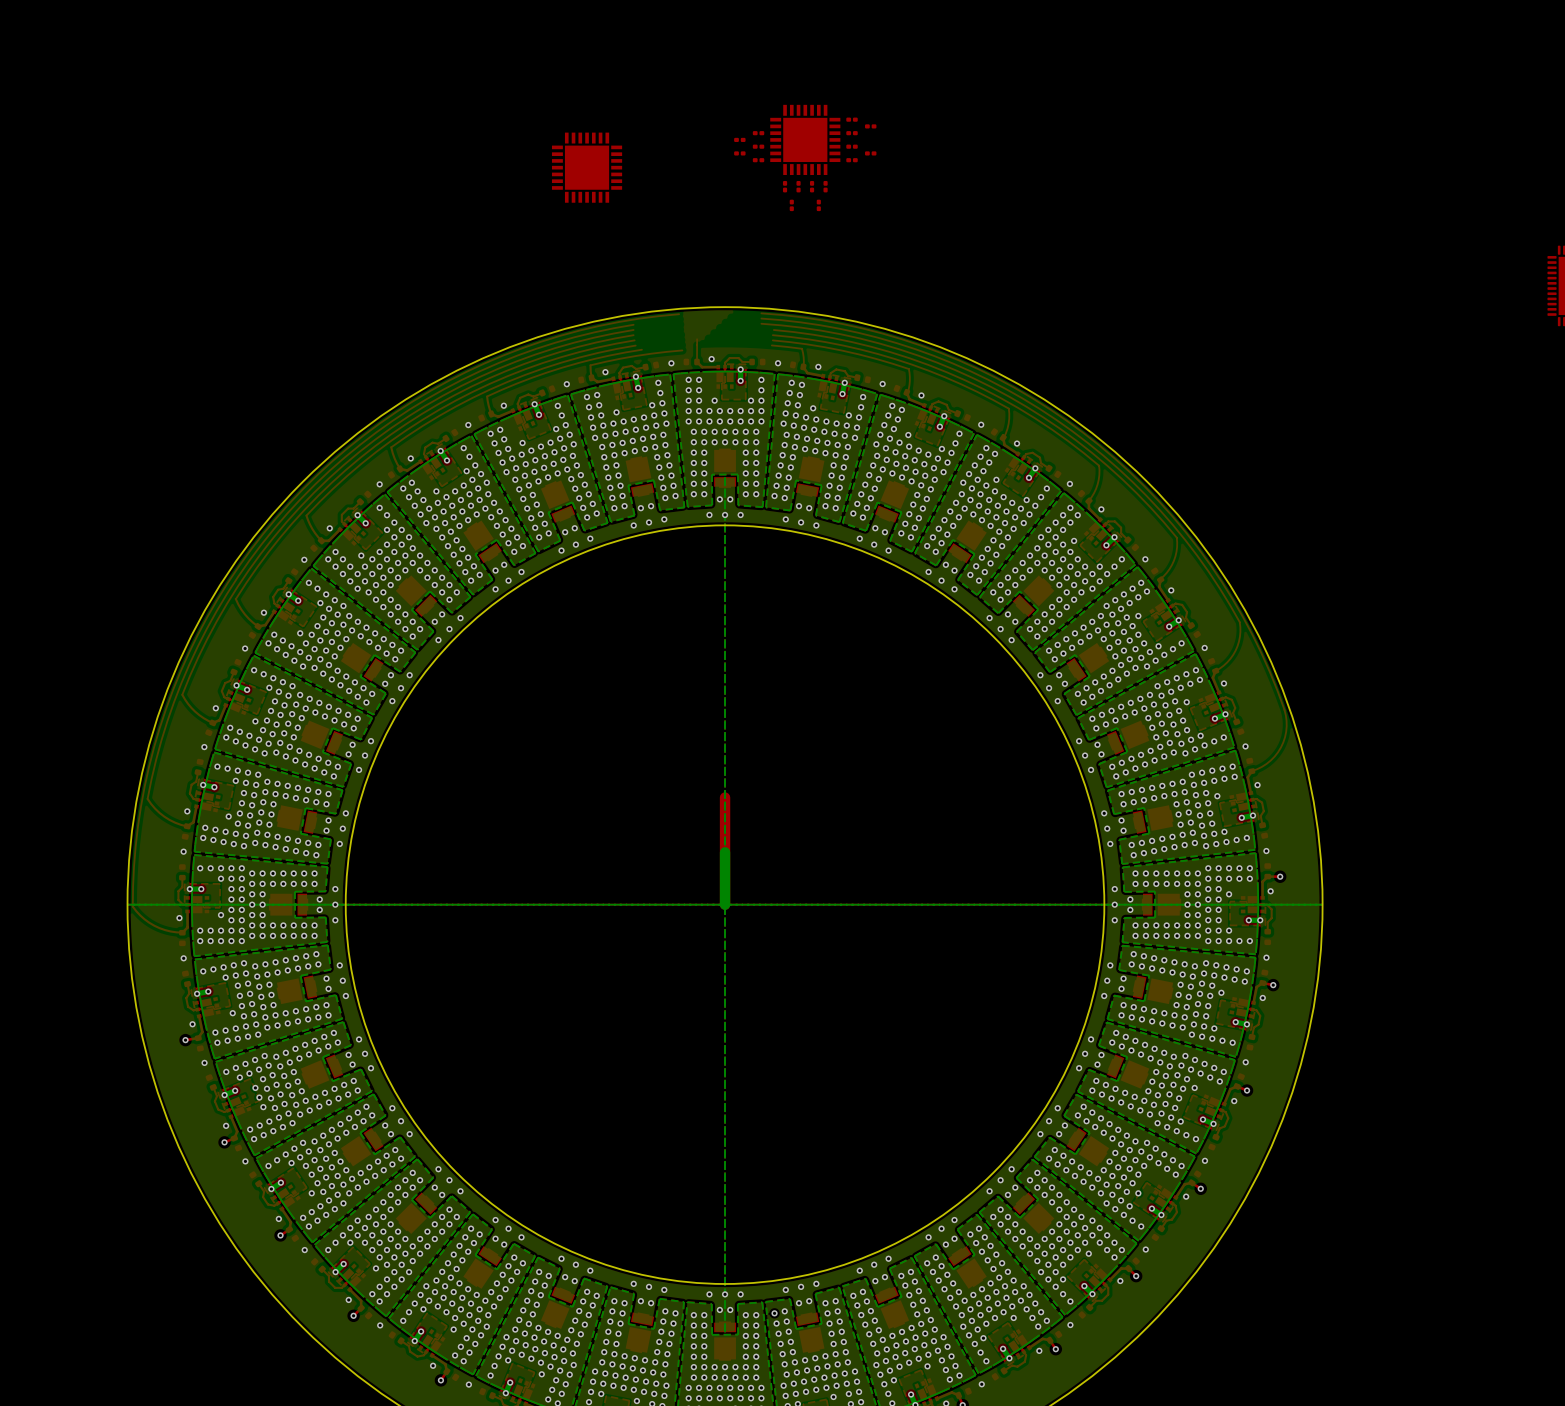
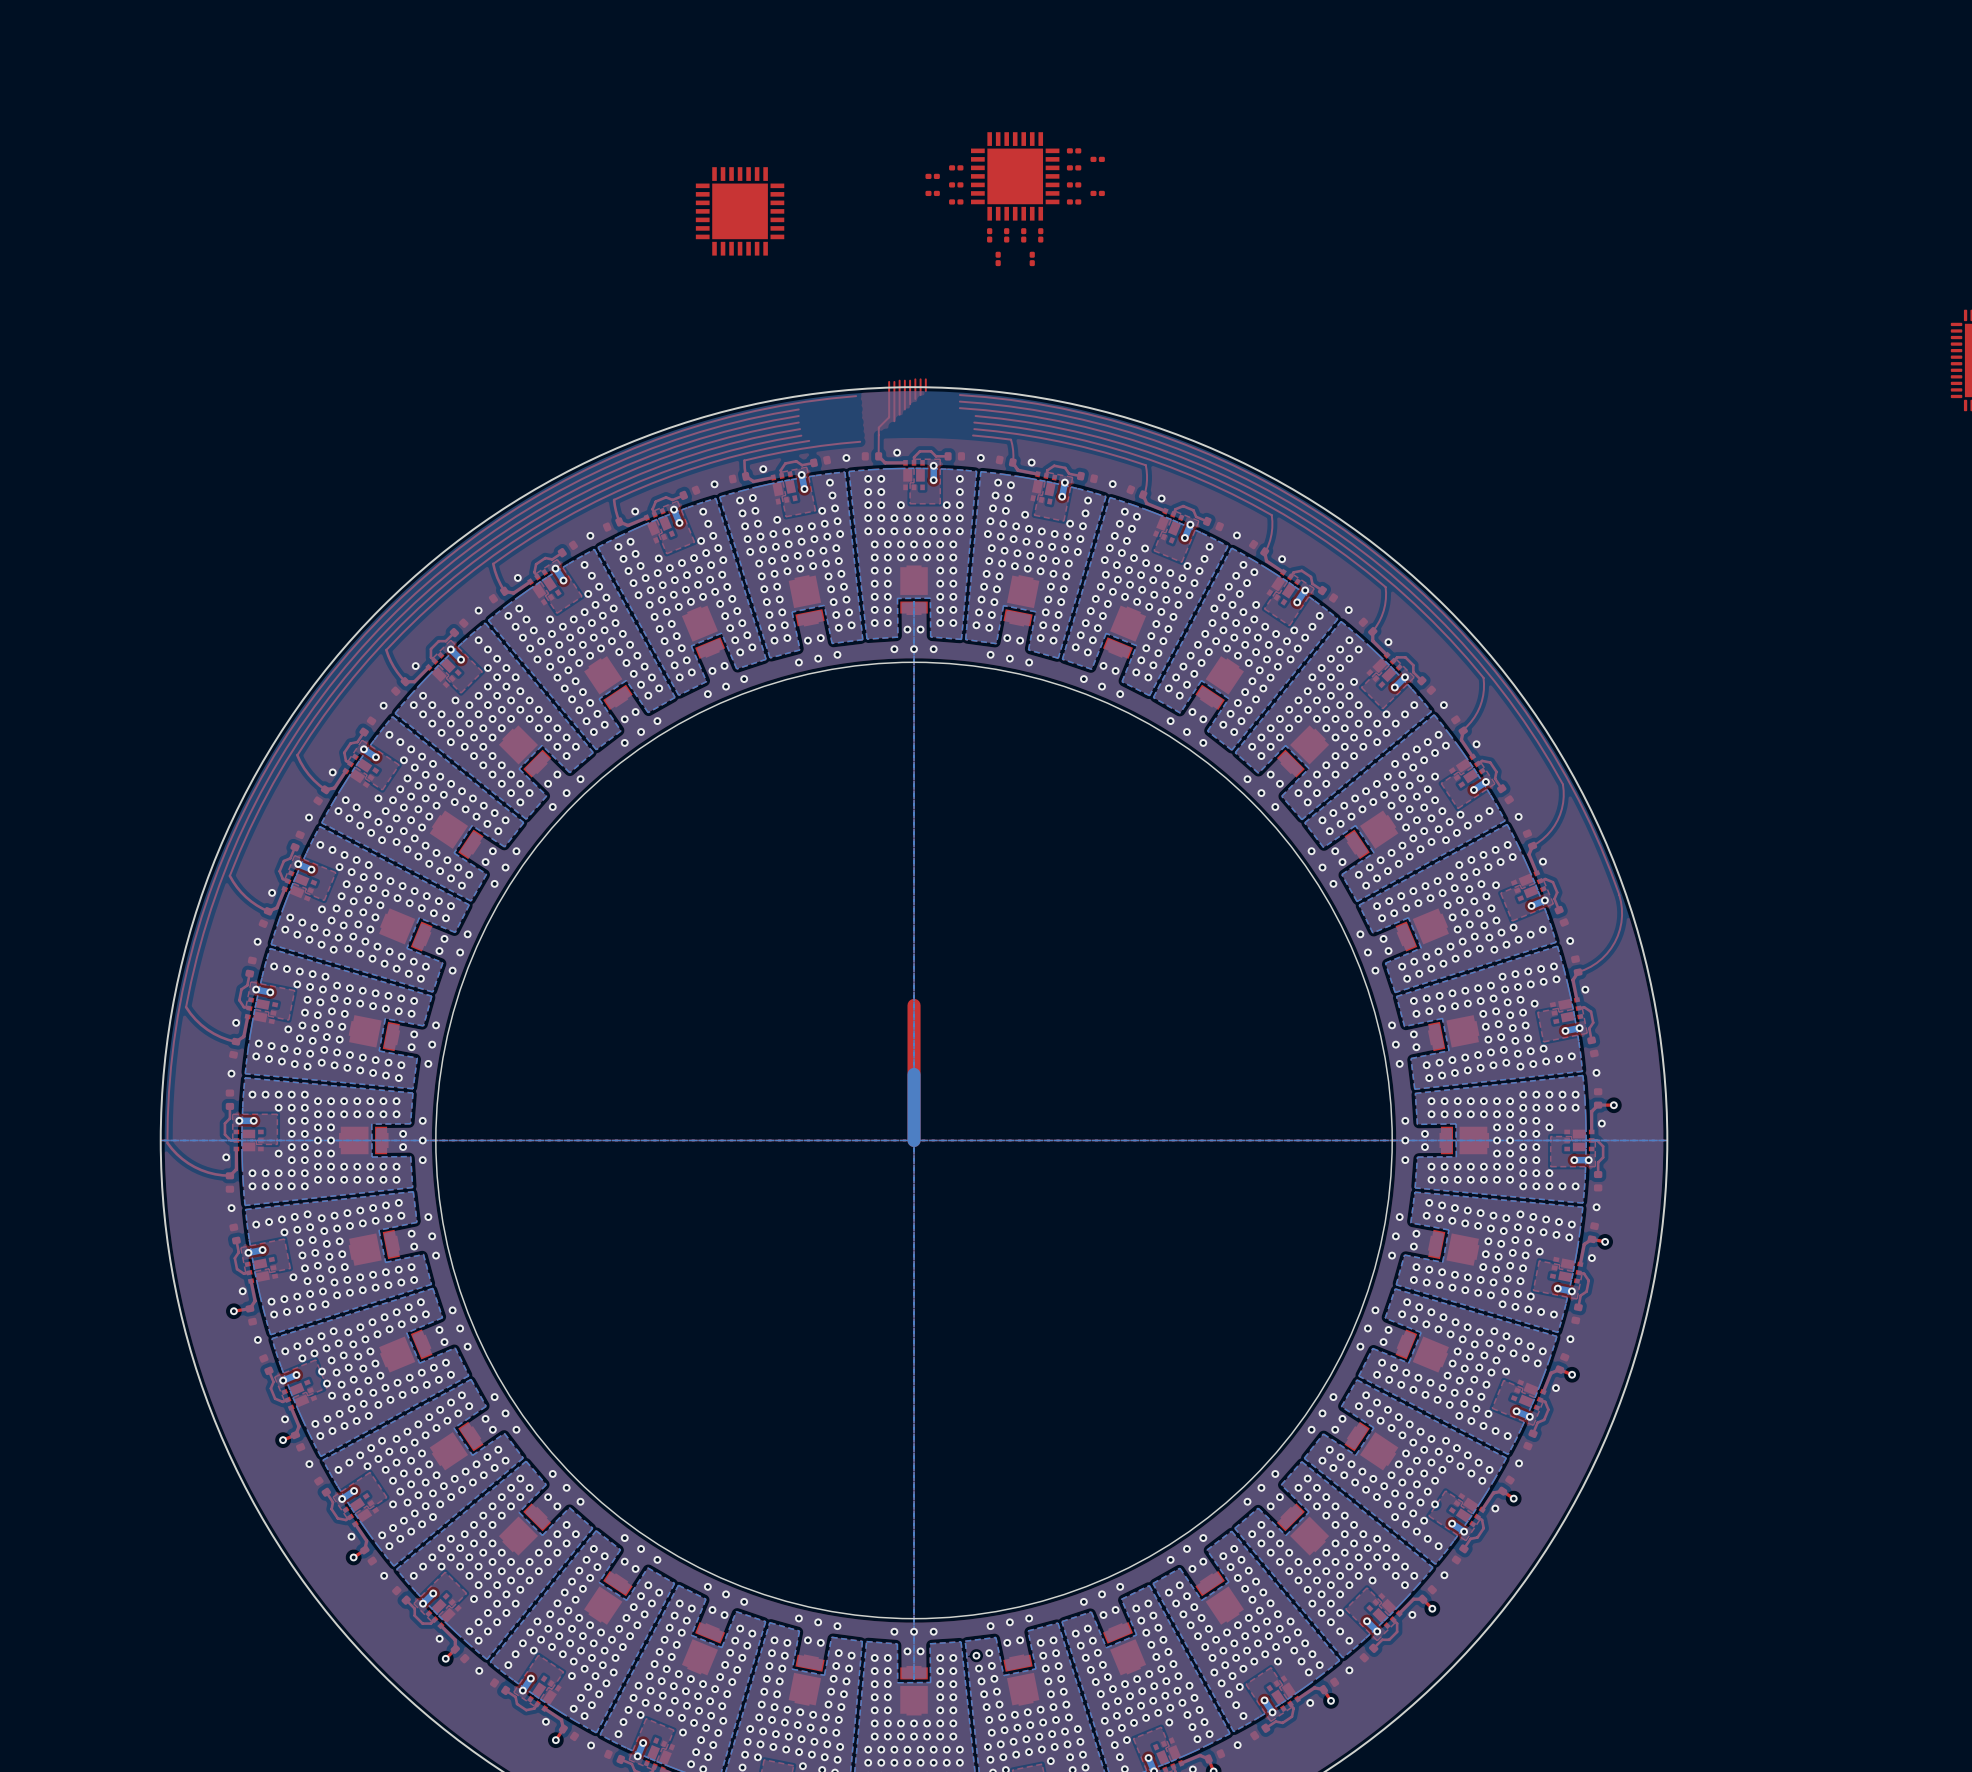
top track: none -> (915, 379) (915, 398)
top track: none -> (920, 379) (920, 395)
top track: none -> (925, 379) (925, 391)
top track: none -> (899, 380) (899, 414)
top track: none -> (904, 380) (904, 409)
top track: none -> (910, 380) (910, 404)
top track: none -> (889, 381) (889, 417) (878, 427)
top track: none -> (894, 381) (894, 421)

